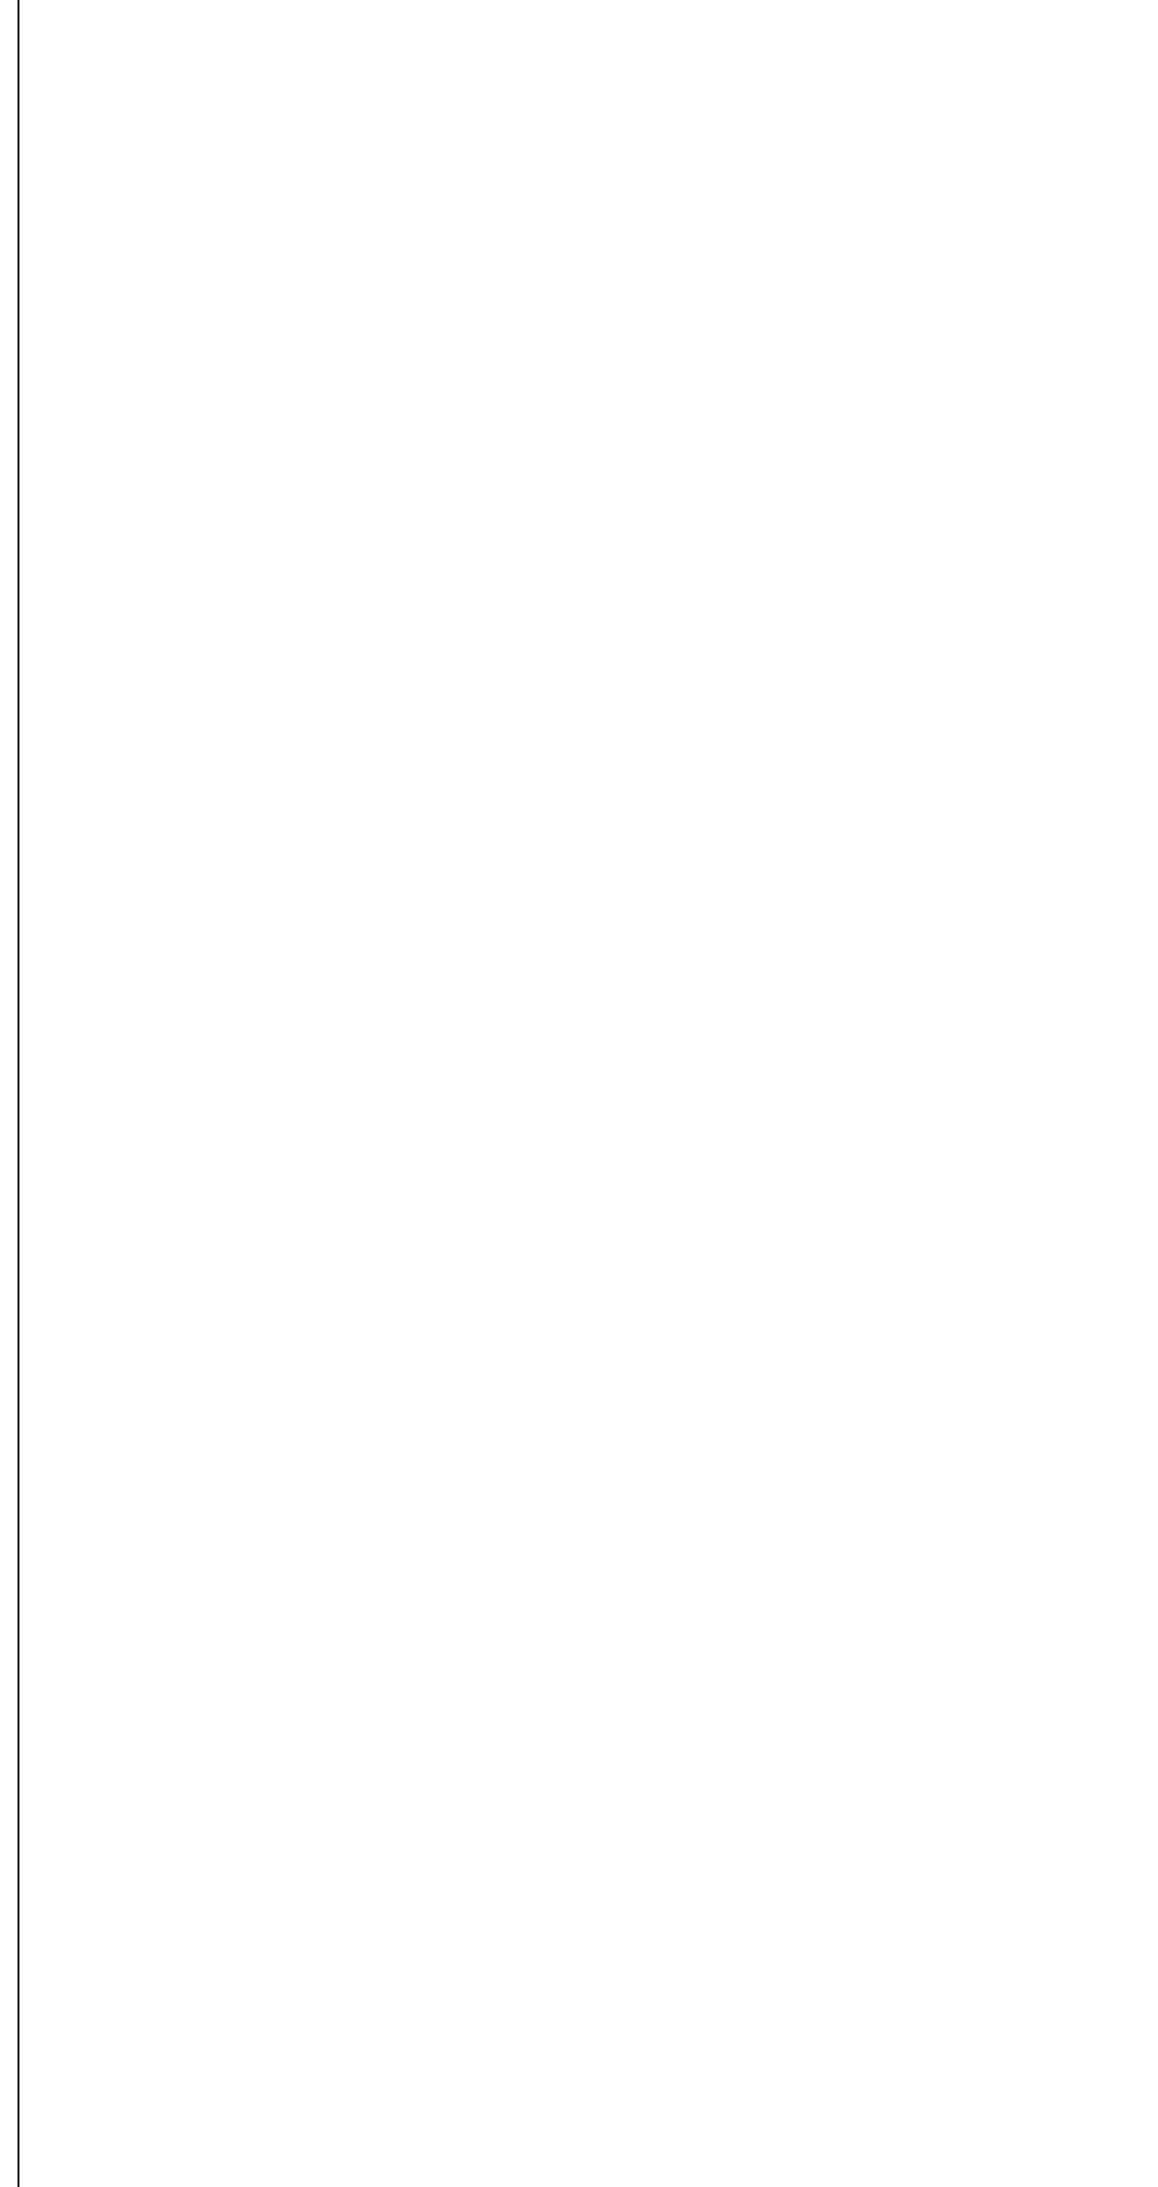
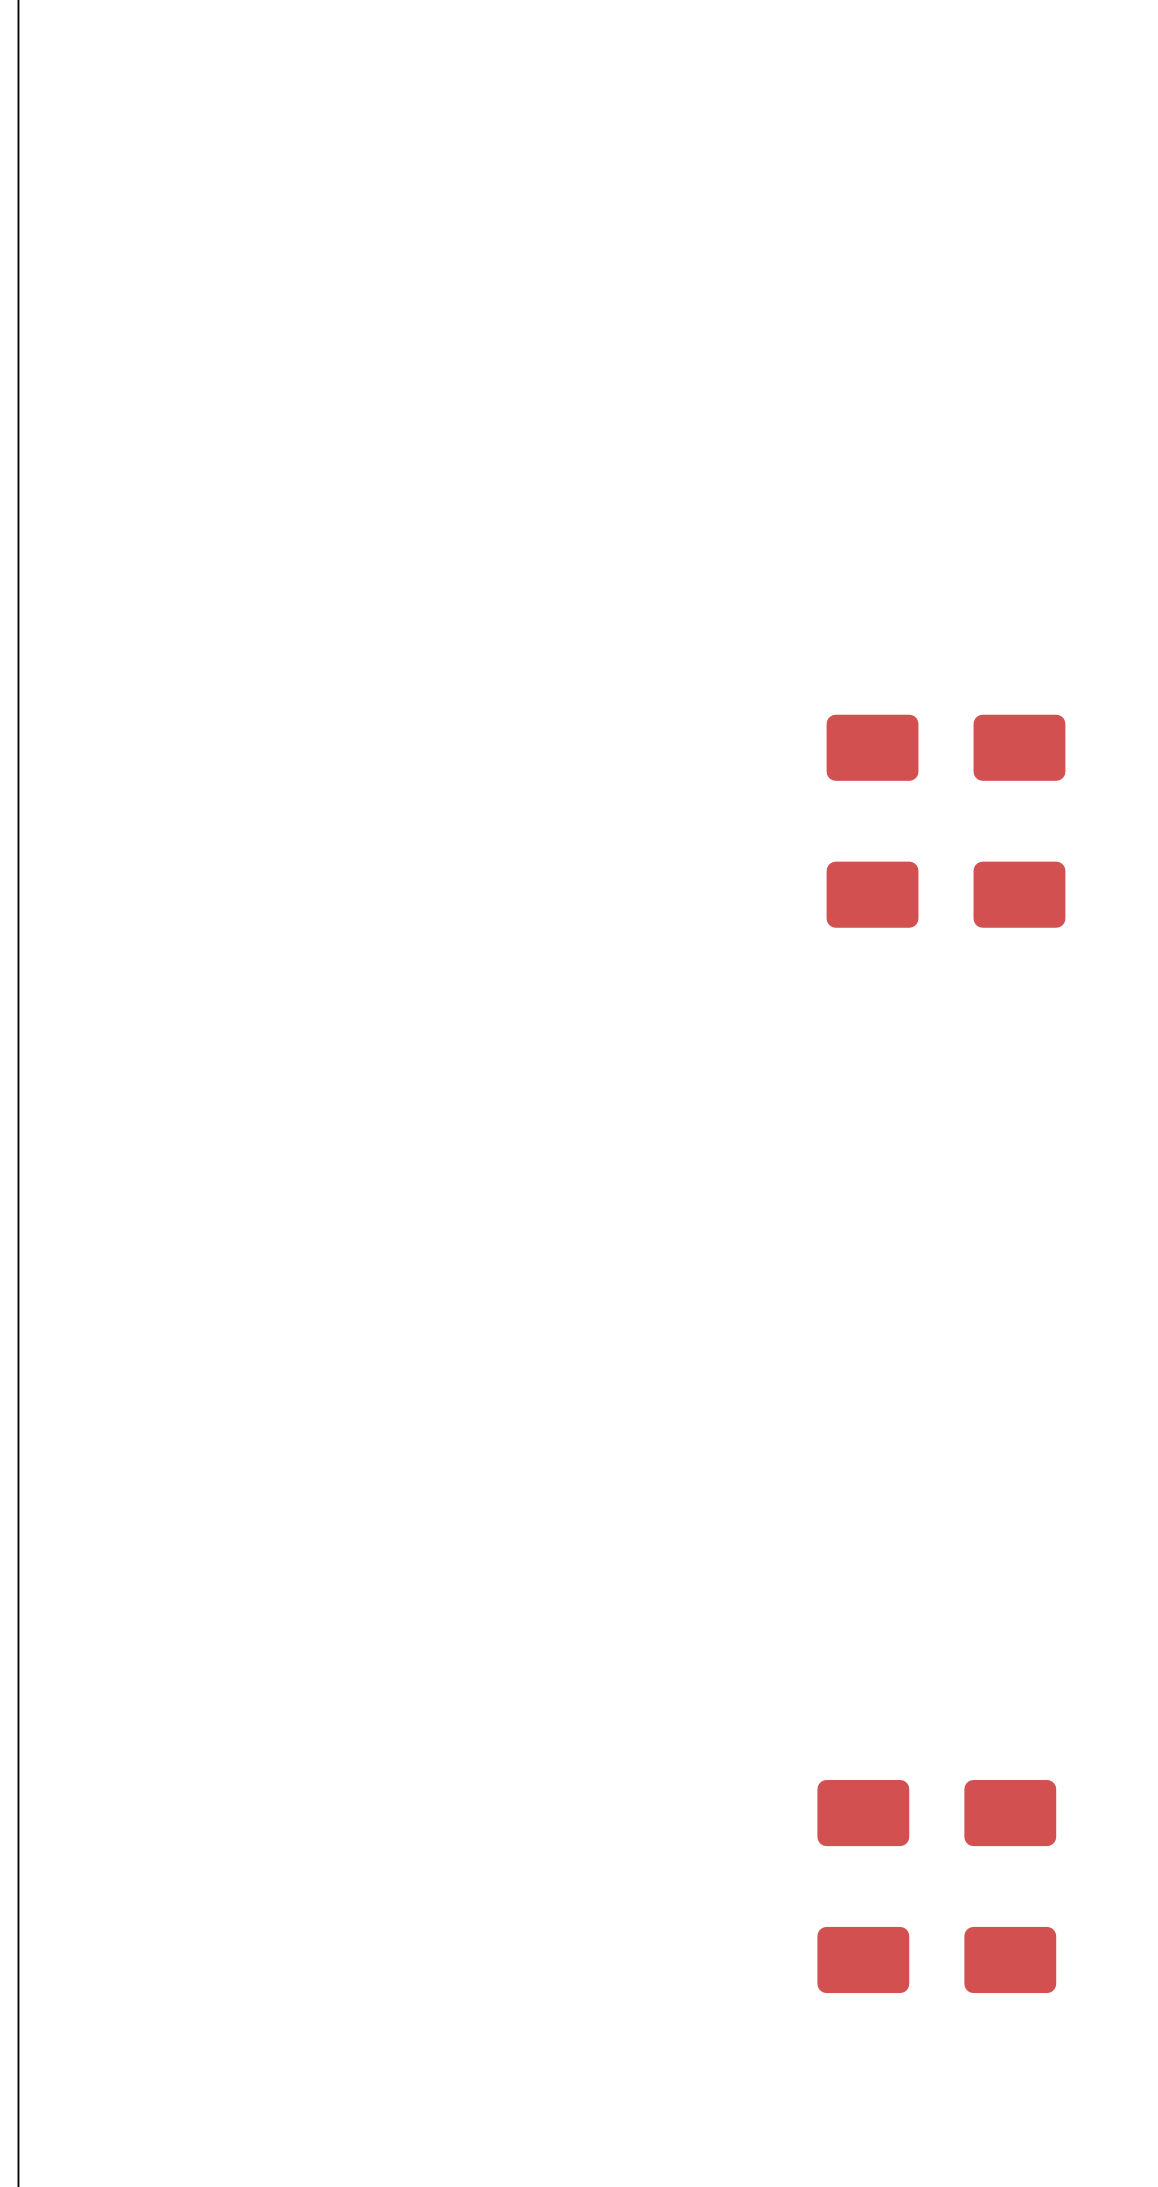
part: none -> (945, 747)
part: none -> (945, 894)
part: none -> (936, 1813)
part: none -> (936, 1959)

